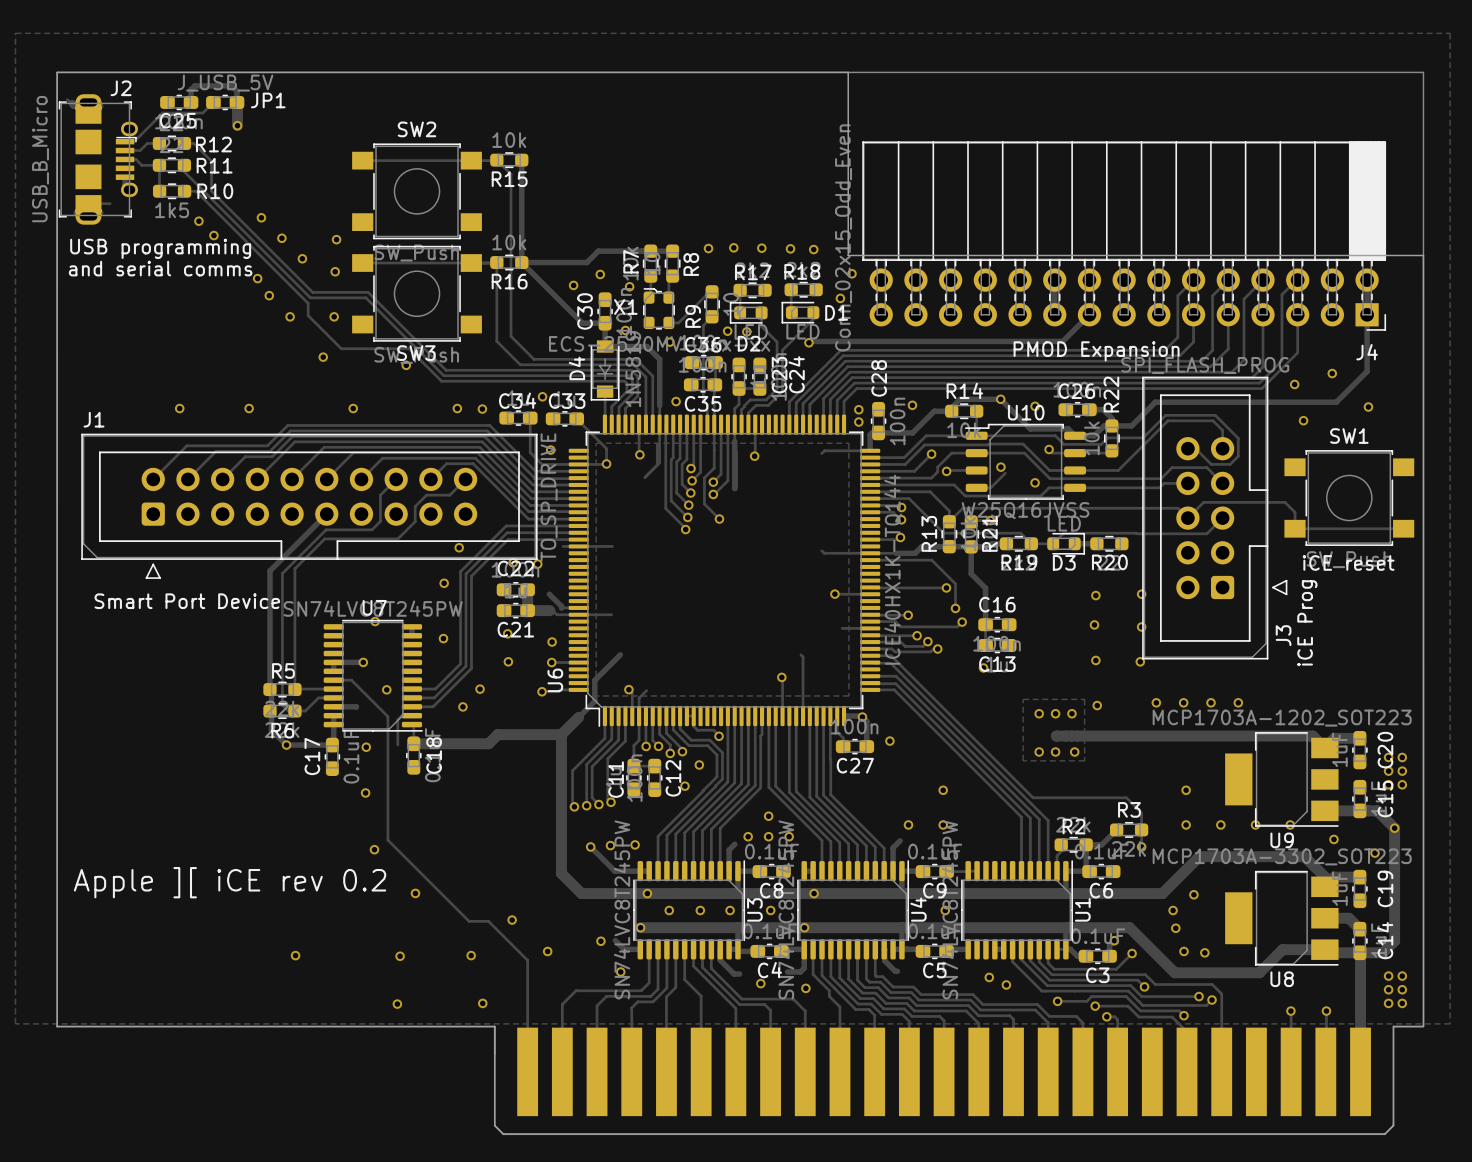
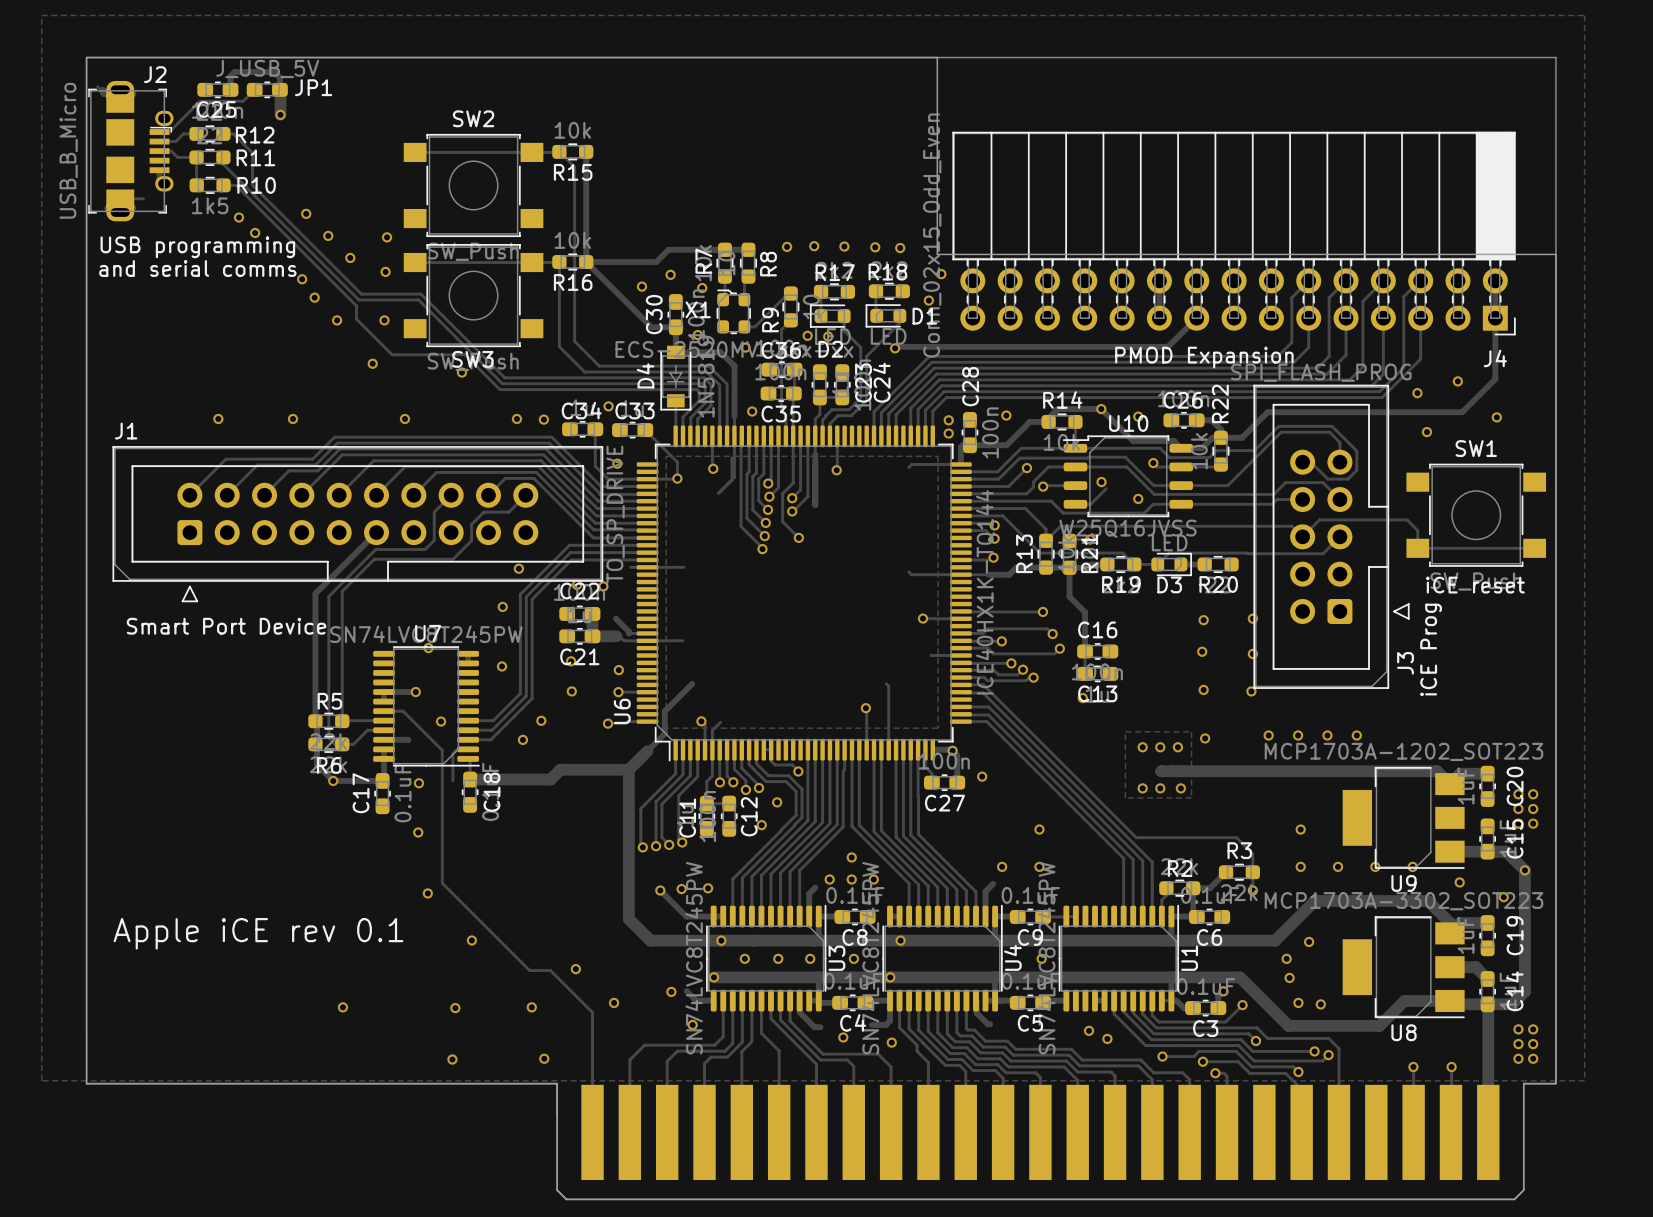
track: (870, 560) (931, 560) (955, 583) (955, 608) -> (960, 633) (983, 633) (987, 628) (1047, 628) (1052, 634)
text: Apple ][ iCE rev 0.2 (230, 882) -> Apple iCE rev 0.1 (258, 933)

